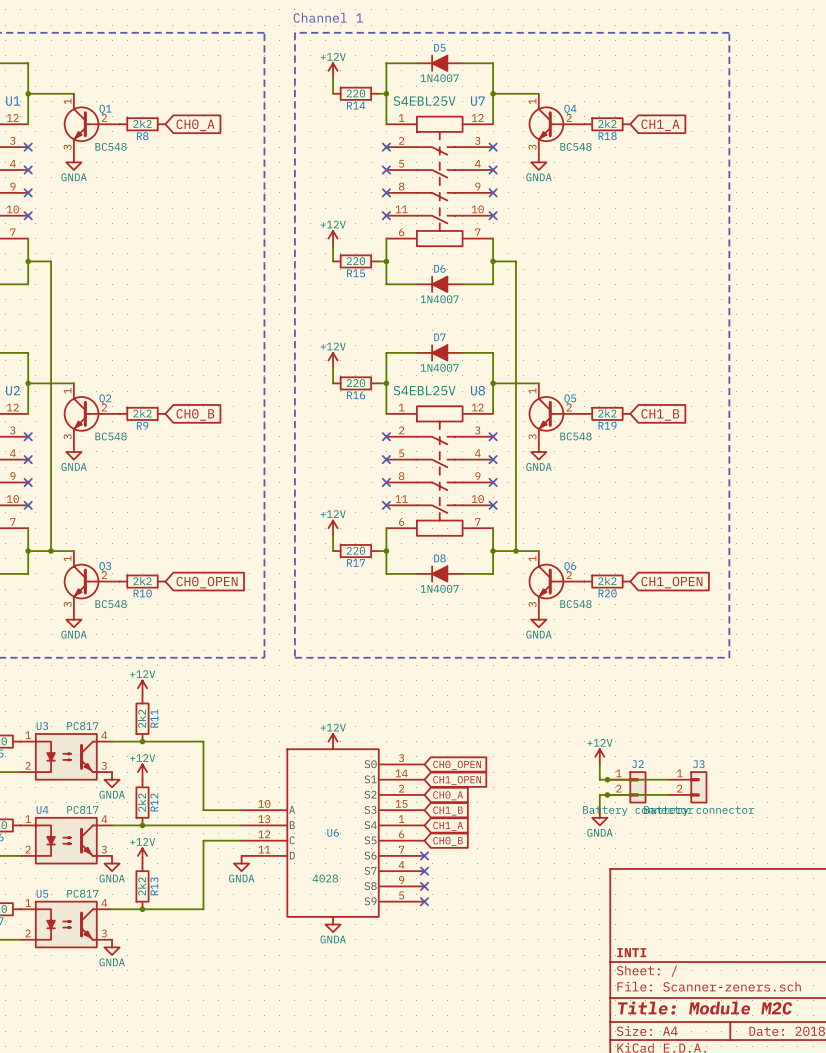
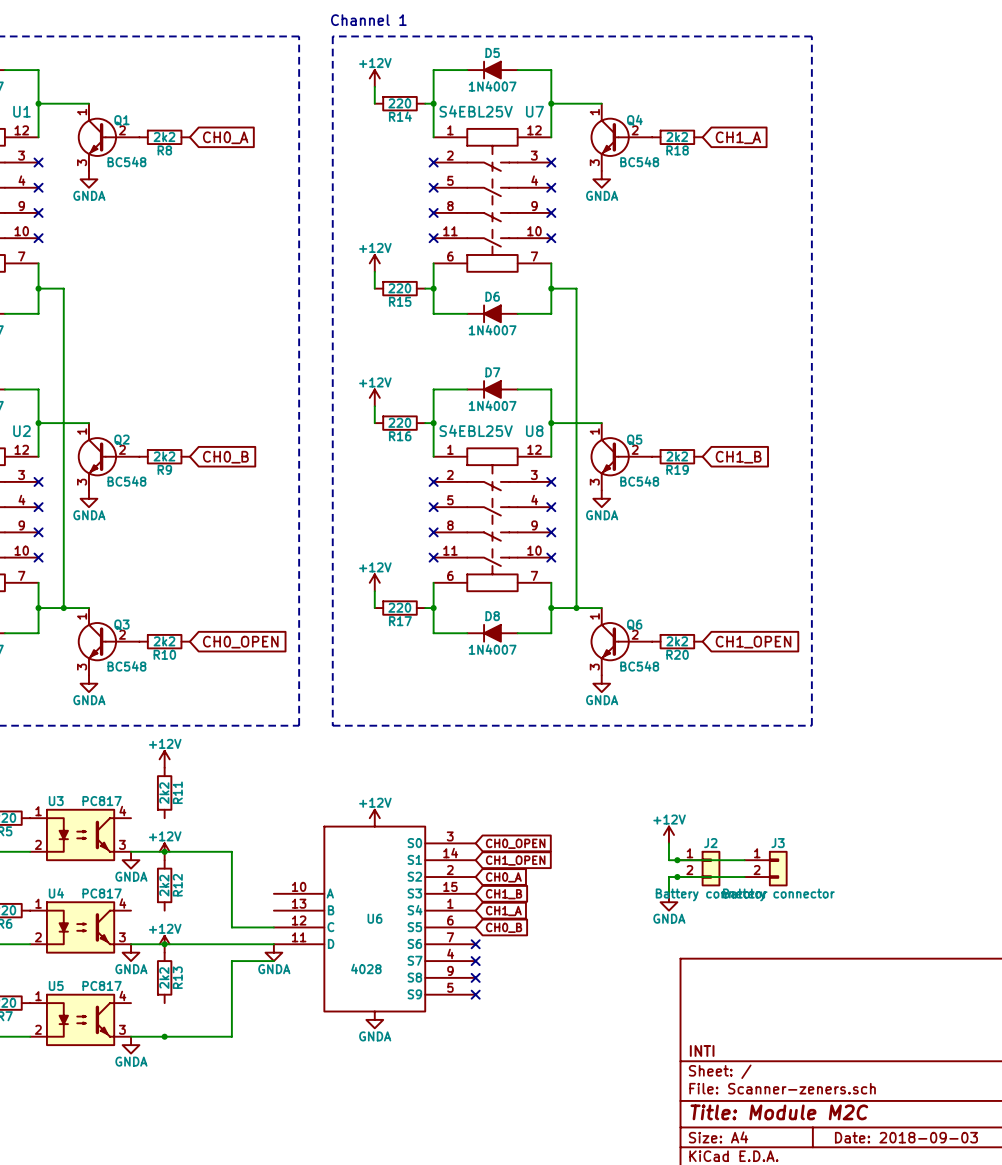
wire: (112, 741) (203, 741) (203, 772) -> (131, 851) (231, 851)
junction: (142, 741) -> none
junction: none -> (164, 851)
wire: (203, 810) (241, 810) -> (231, 893) (231, 927)
wire: (112, 825) (241, 825) -> (131, 944) (273, 944)
junction: (142, 825) -> none
wire: (203, 840) (203, 871) -> (273, 961) (231, 961)
junction: none -> (164, 944)
wire: (112, 909) (203, 909) -> (131, 1036) (231, 1036) (231, 1003)
junction: (142, 909) -> none
junction: none -> (164, 1036)

